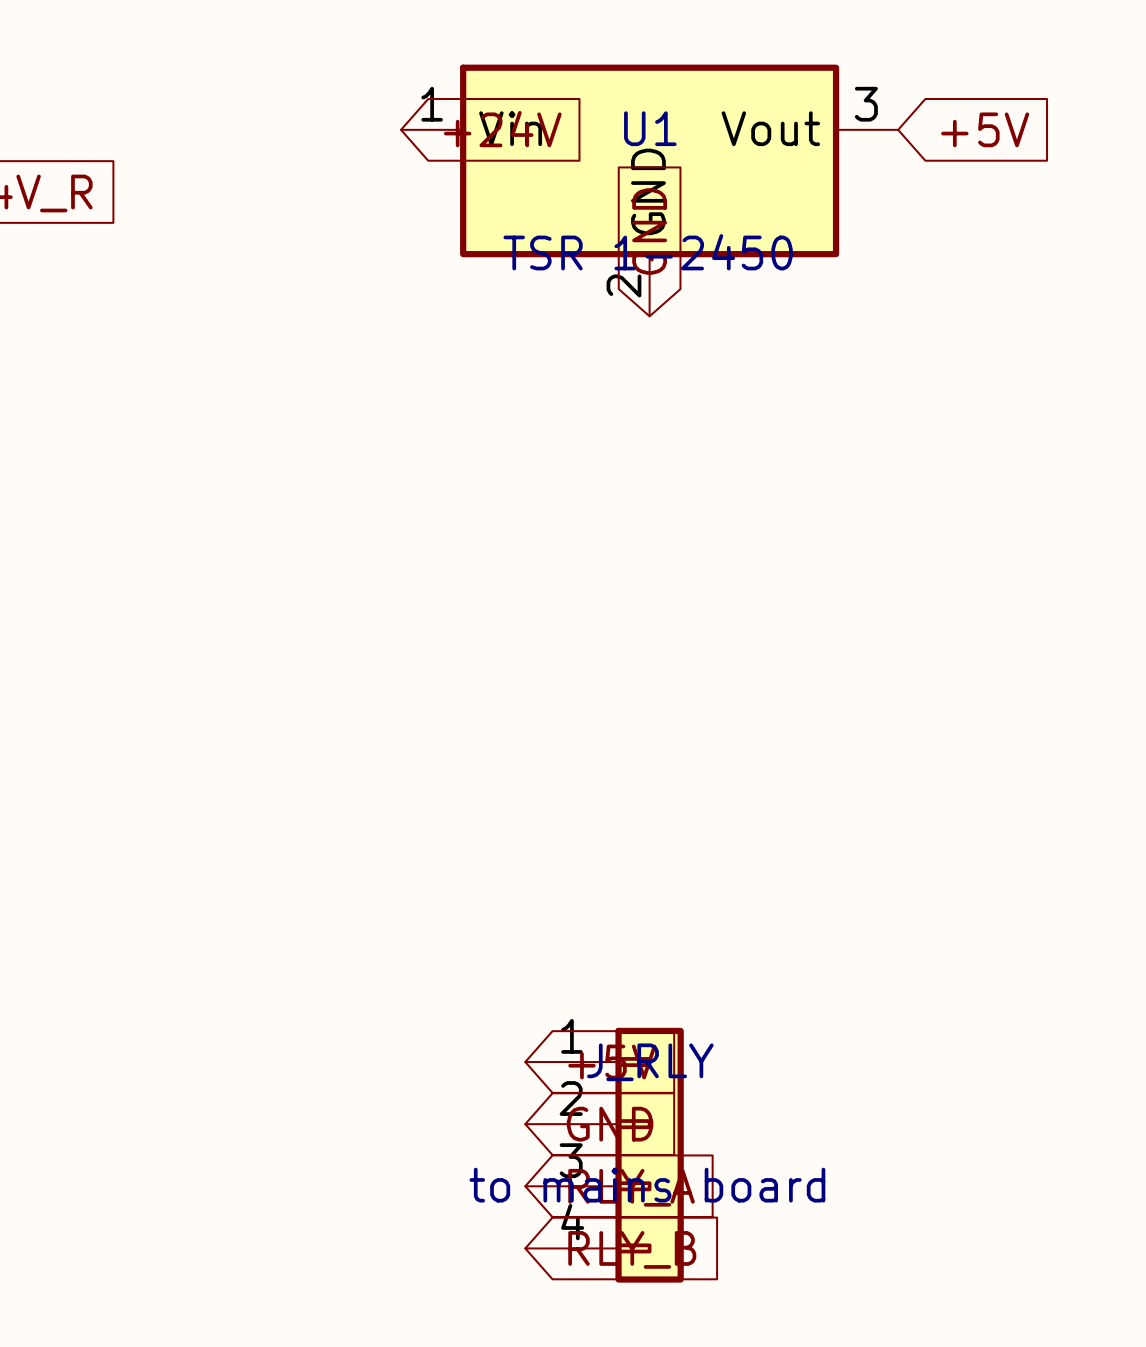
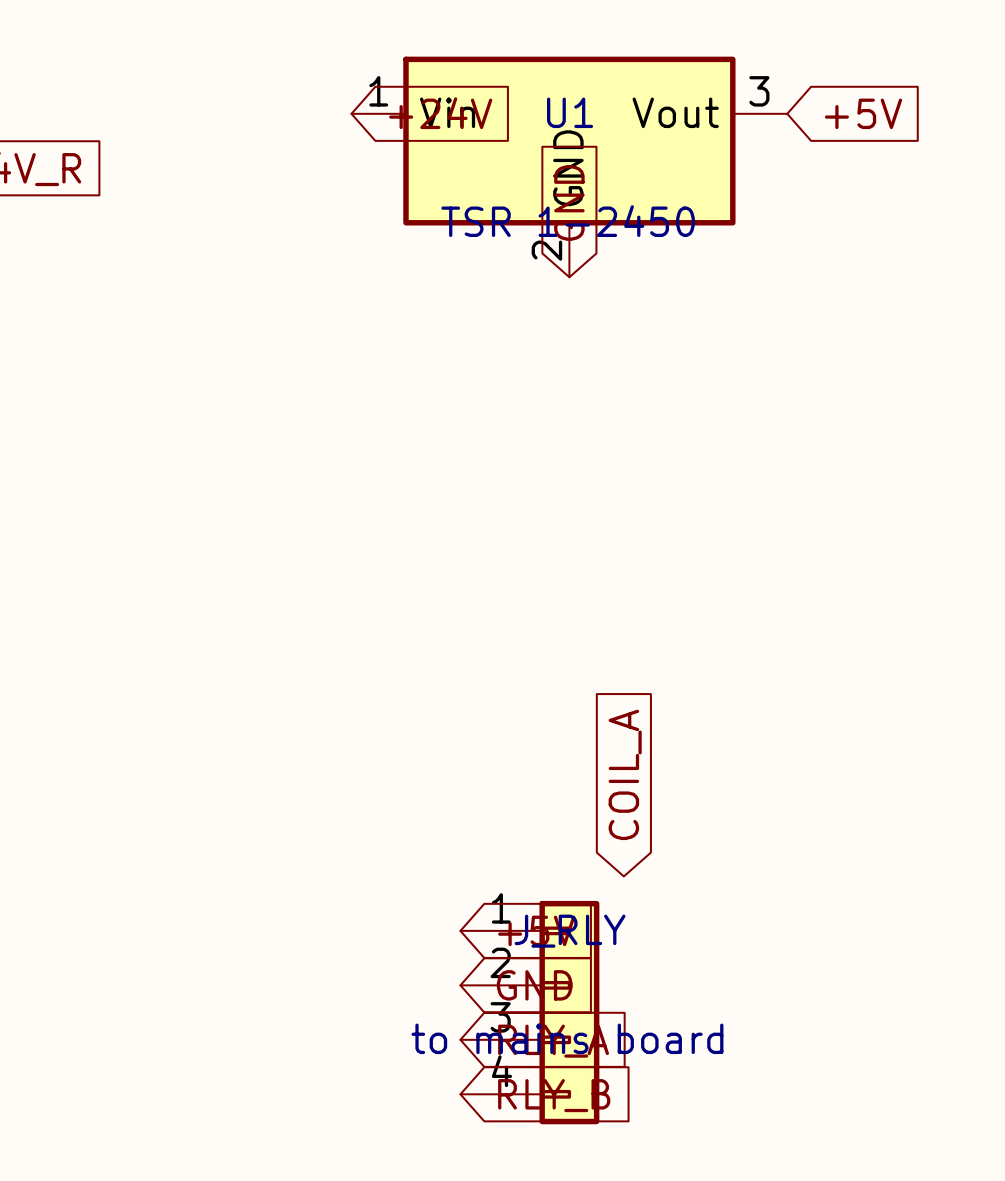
global label: none -> COIL_A (625, 774)

